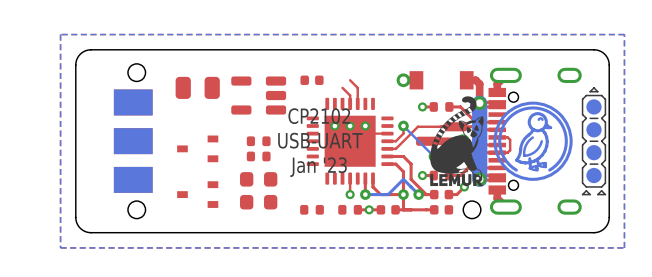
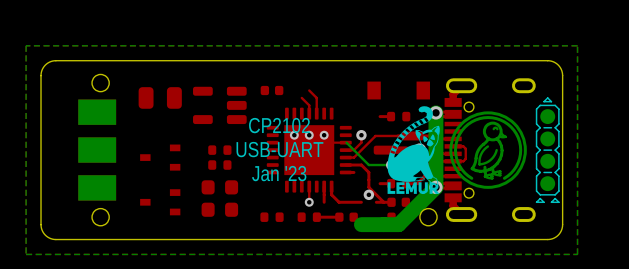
via: (403, 80) -> none
top track: (466, 80) (475, 80) (479, 84) (479, 103) -> none
via: (422, 106) -> none
top track: (449, 106) (460, 106) (475, 122) (497, 122) -> none
bottom track: (403, 126) (433, 156) -> (346, 142) (368, 165) (391, 165)
top track: (395, 164) (403, 171) (403, 209) -> none
via: (422, 175) -> none
bottom track: none -> (435, 187) (398, 224) (361, 224)
via: none -> (368, 194)
top track: (464, 186) (456, 194) (448, 194) -> none
via: (464, 186) -> none
via: (365, 194) -> none
via: (403, 194) -> none
bottom track: (418, 194) (403, 179) (388, 194) (365, 194) -> none
via: (418, 194) -> none
via: (369, 209) -> none
top track: (434, 209) (395, 209) -> none

